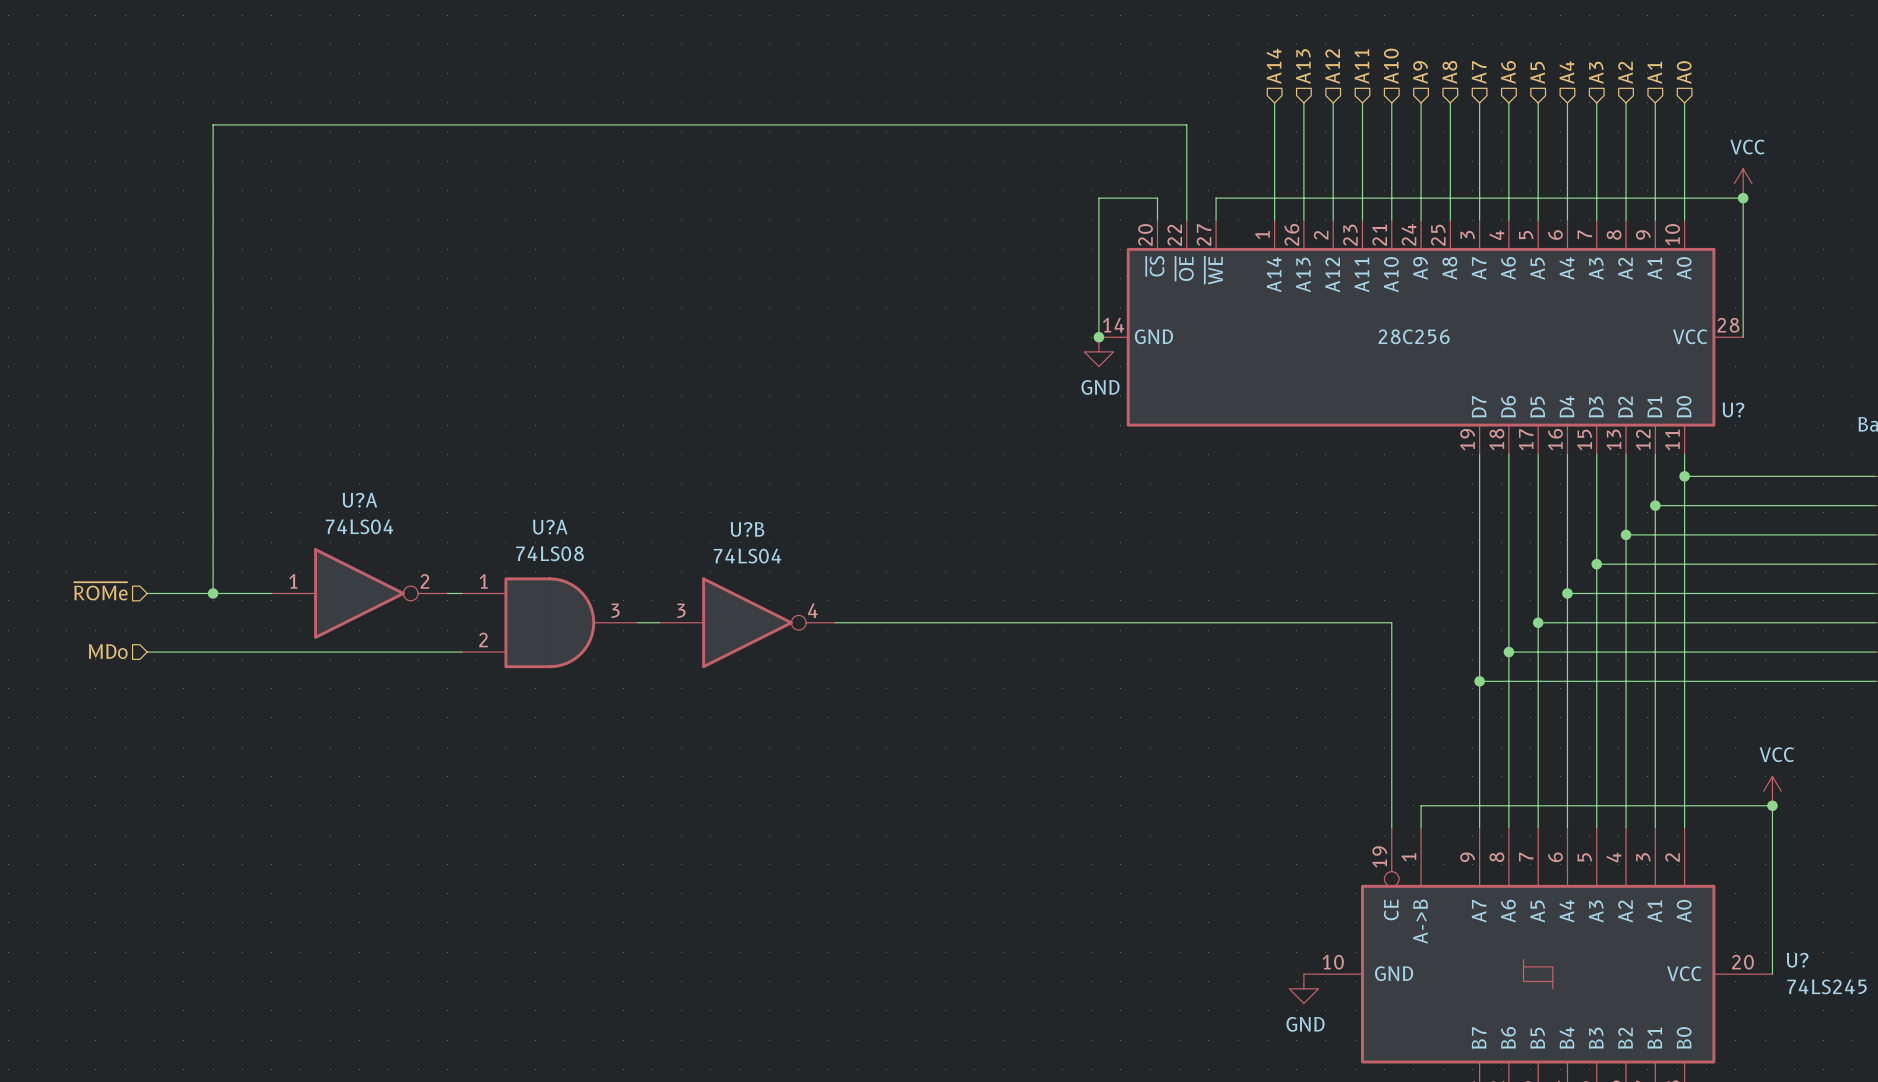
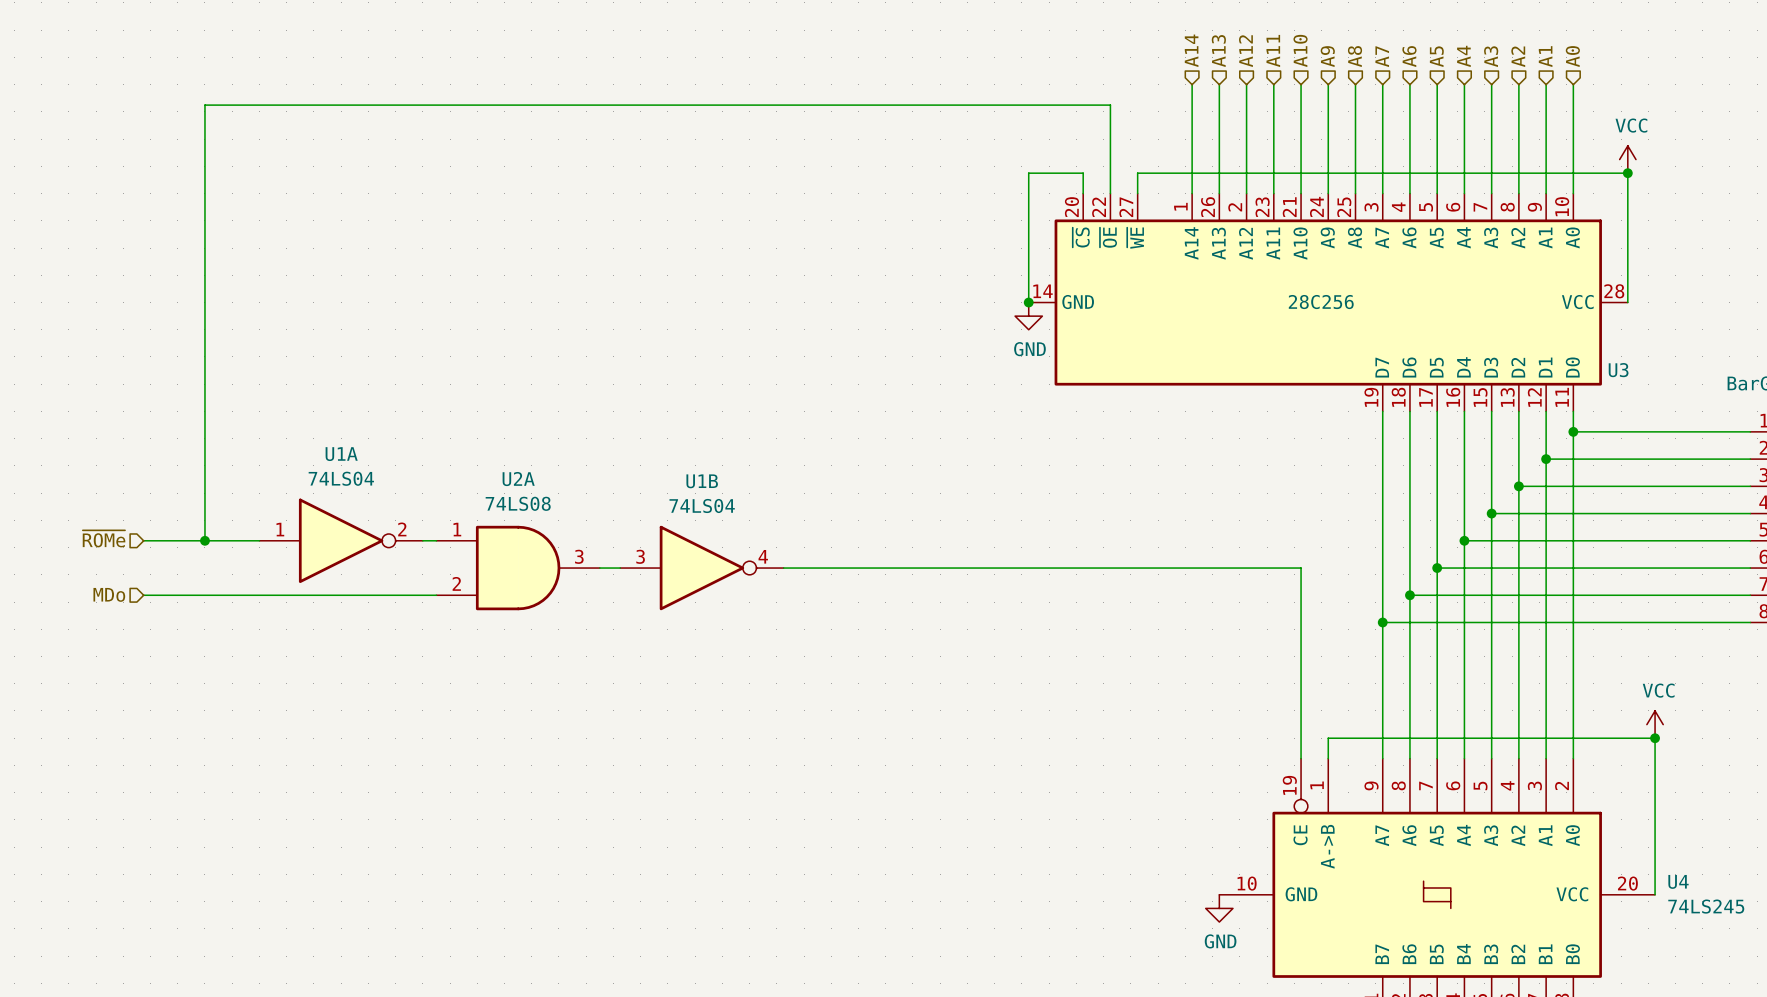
U? name: U? (1733, 409) -> U3 (1618, 370)
U?A name: U?A (359, 500) -> U1A (341, 454)
U?A name: U?A (550, 527) -> U2A (518, 479)
U?B name: U?B (747, 529) -> U1B (702, 481)
U? name: U? (1797, 960) -> U4 (1678, 881)

